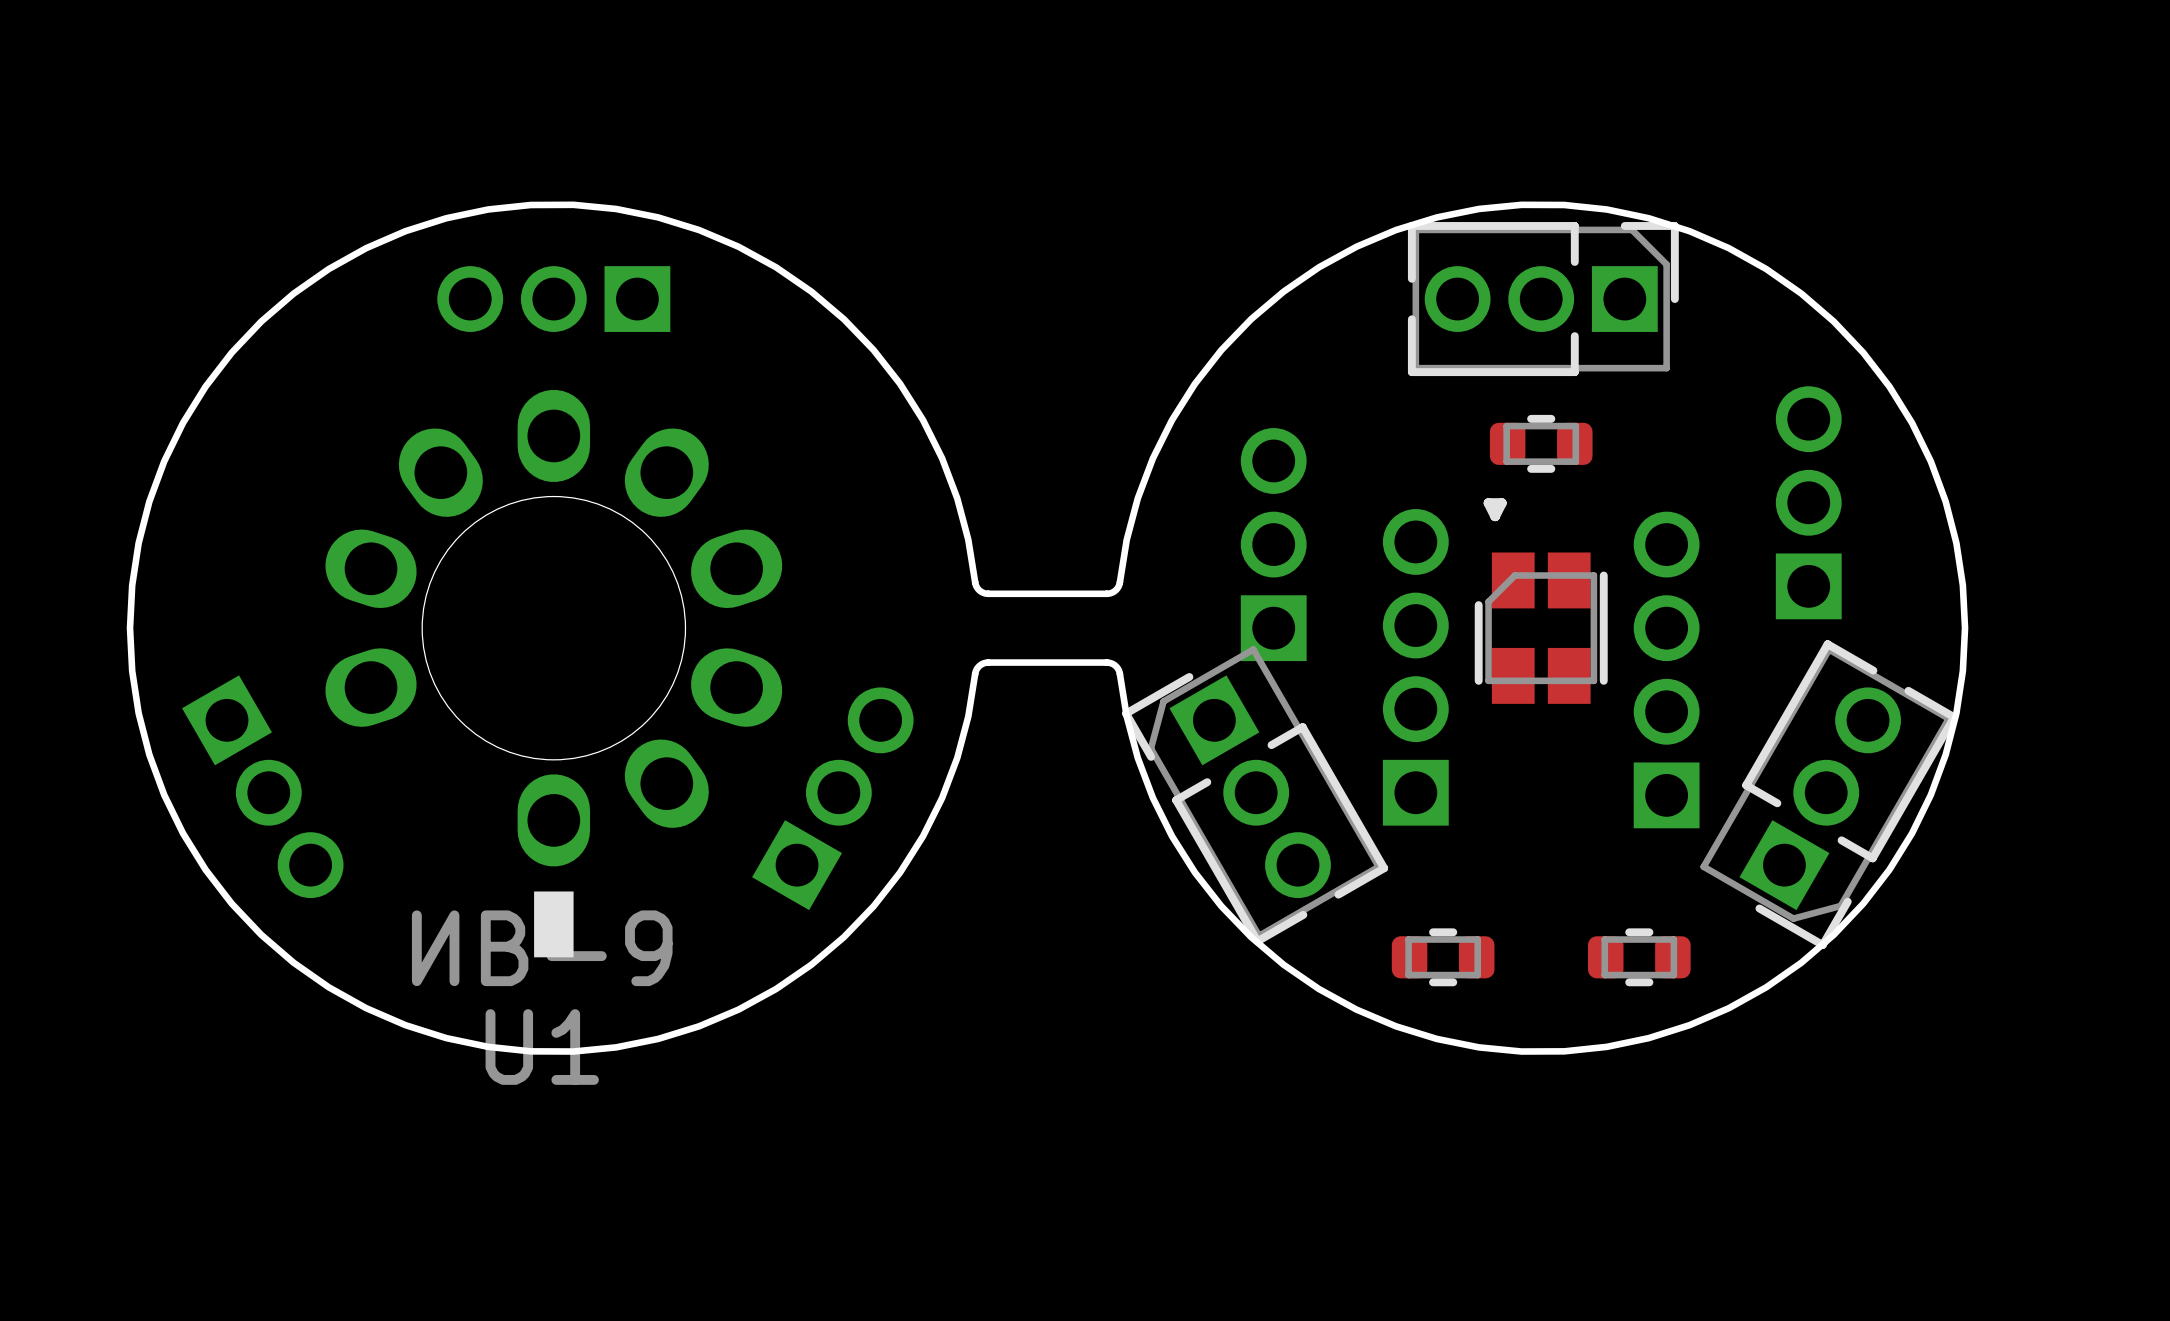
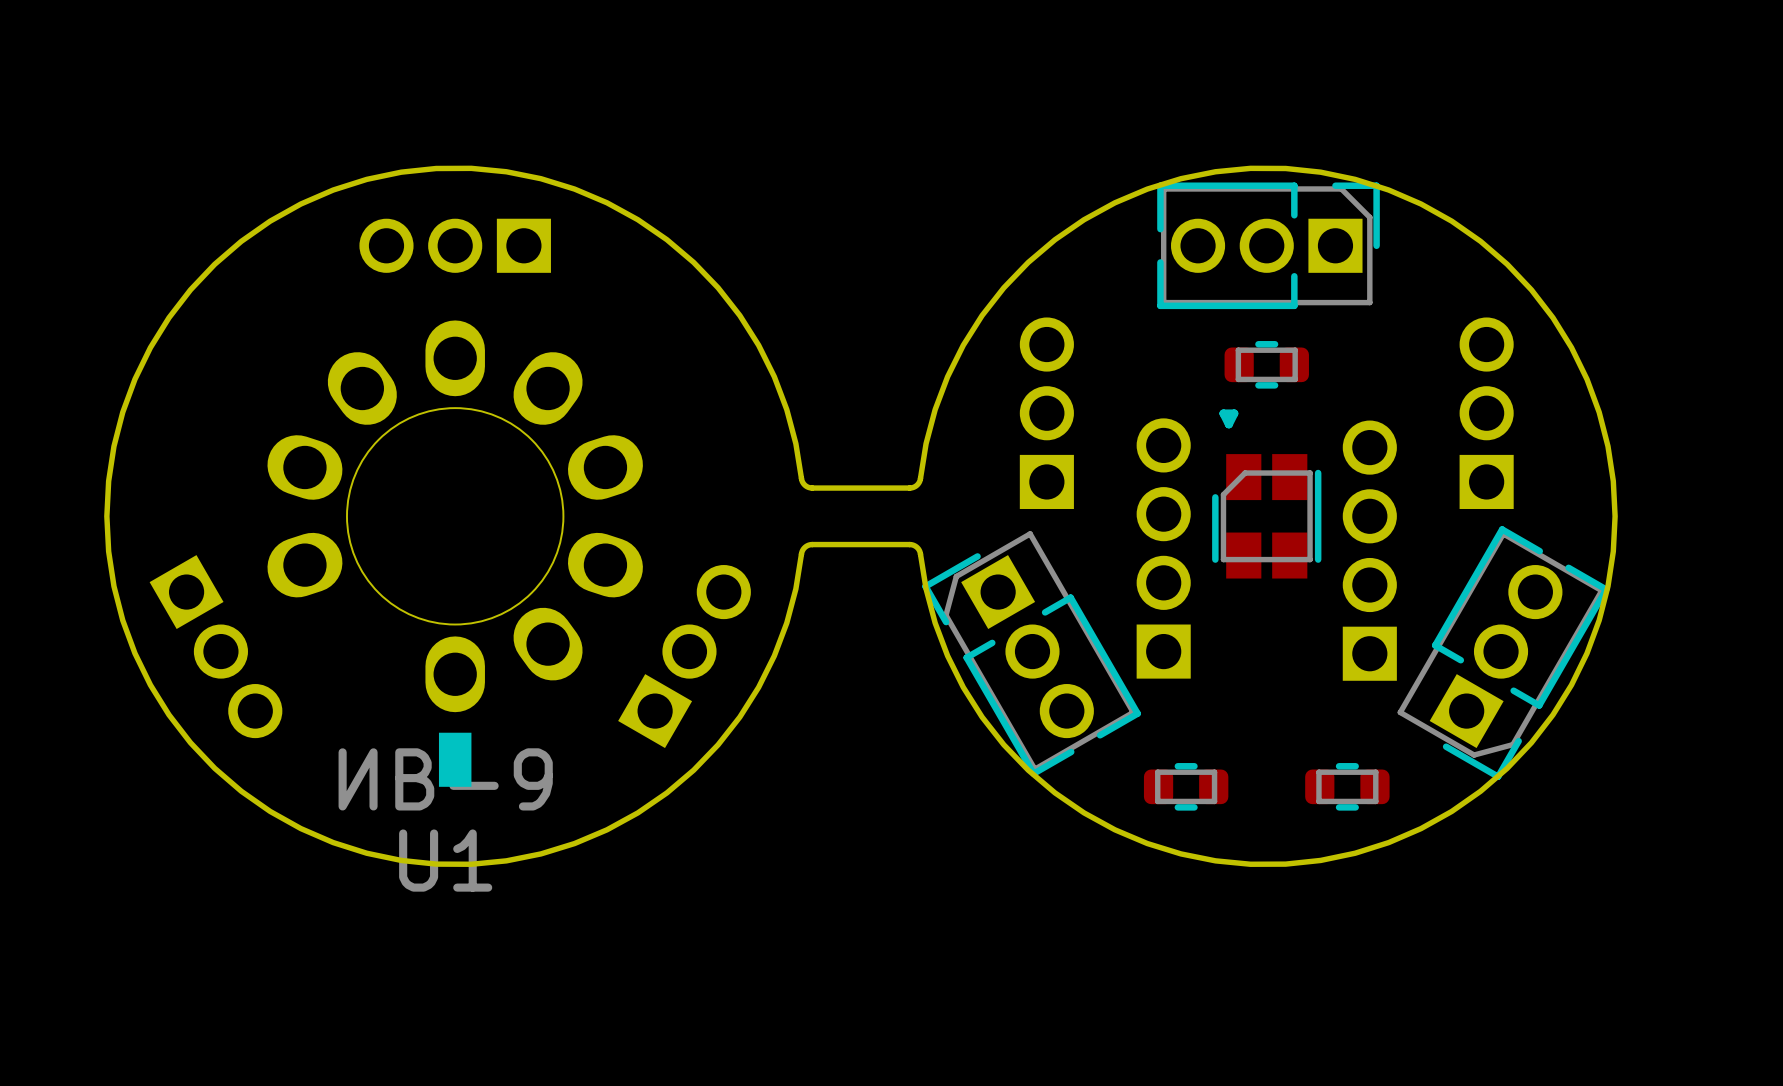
part position: (1273, 544) -> (1046, 413)

